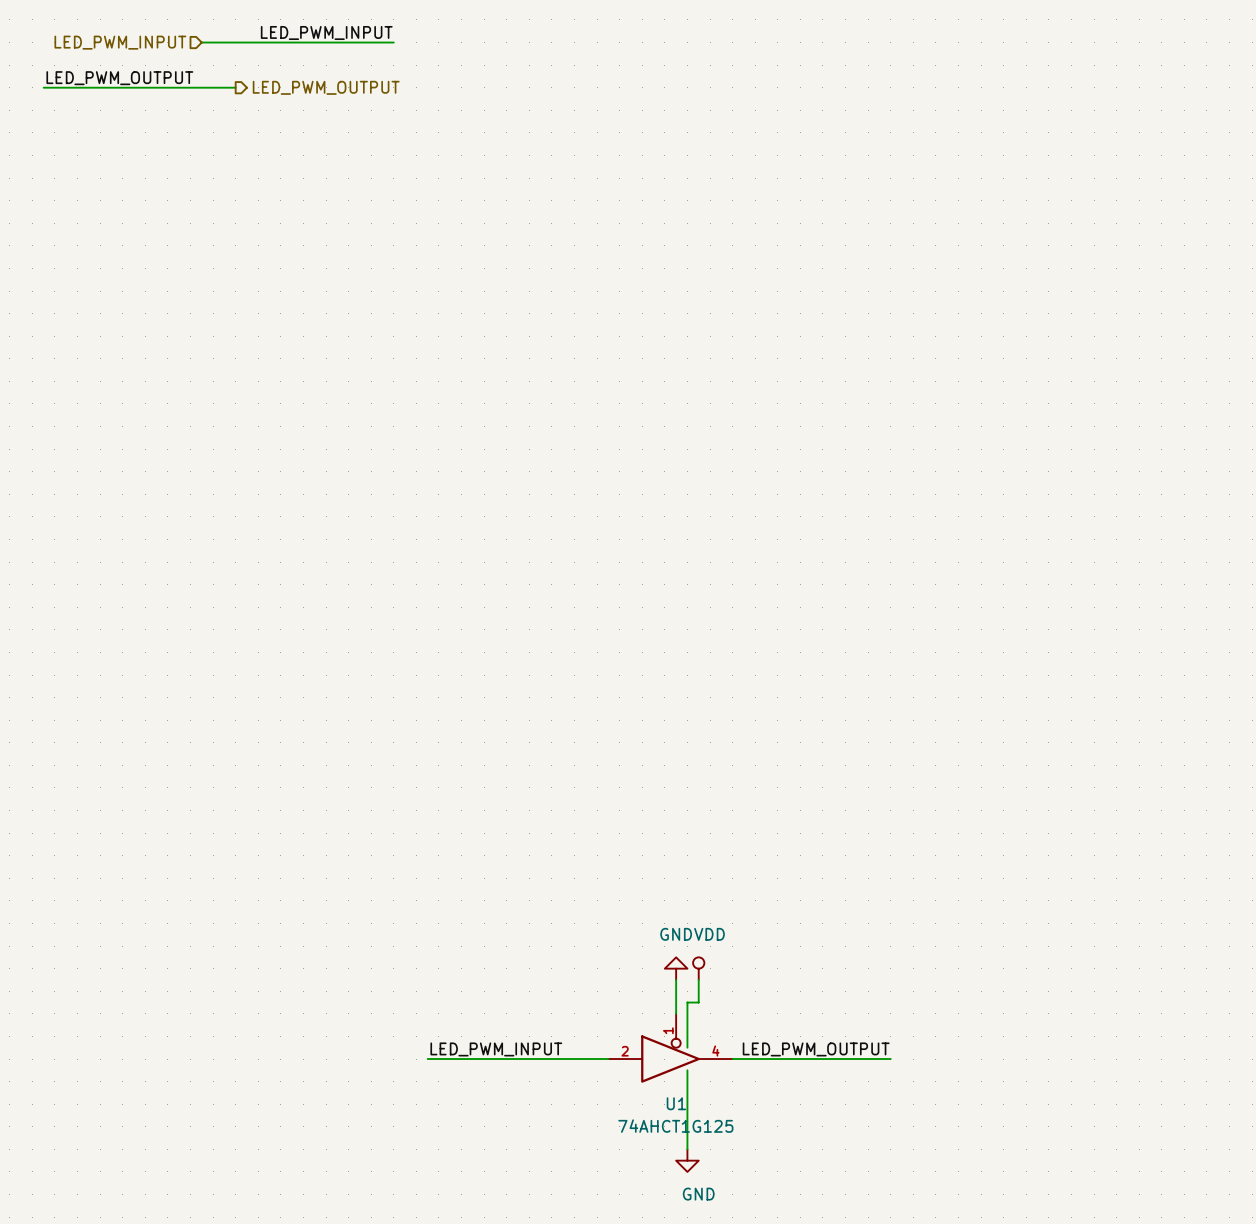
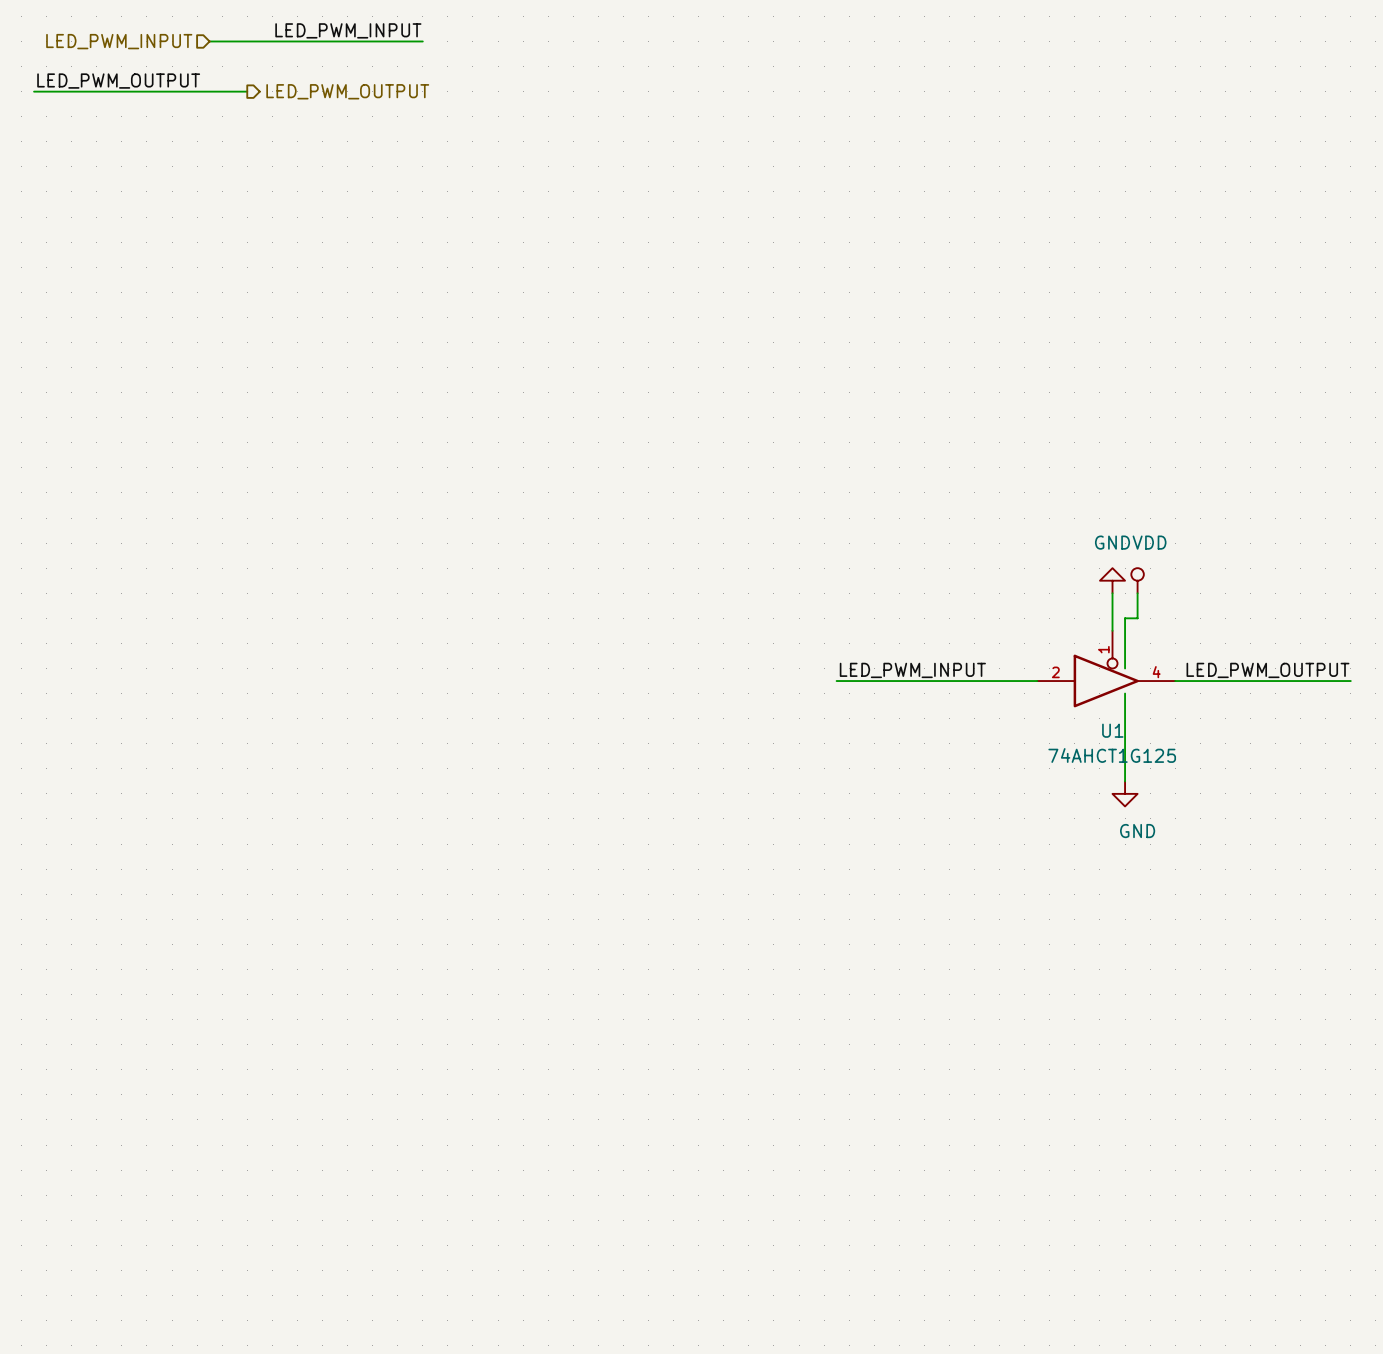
power symbol: none -> GND (1112, 580)
power symbol: none -> VDD (1137, 580)
wire: none -> (1112, 593) (1112, 630)
wire: none -> (1137, 593) (1137, 618) (1125, 618) (1125, 668)
label: none -> LED_PWM_INPUT (912, 670)
label: none -> LED_PWM_OUTPUT (1267, 670)
wire: none -> (836, 681) (1037, 681)
wire: none -> (1175, 681) (1350, 681)
wire: none -> (1125, 693) (1125, 781)
power symbol: none -> GND (1125, 793)
power symbol: GND (676, 968) -> none
power symbol: VDD (698, 968) -> none
wire: (676, 979) (676, 1013) -> none
wire: (698, 979) (698, 1002) (687, 1002) (687, 1047) -> none
U1 position: (670, 1048) -> (1106, 669)
label: LED_PWM_INPUT (496, 1049) -> none
label: LED_PWM_OUTPUT (816, 1049) -> none
wire: (427, 1059) (608, 1059) -> none
wire: (732, 1059) (890, 1059) -> none
wire: (687, 1070) (687, 1149) -> none
power symbol: GND (687, 1160) -> none

